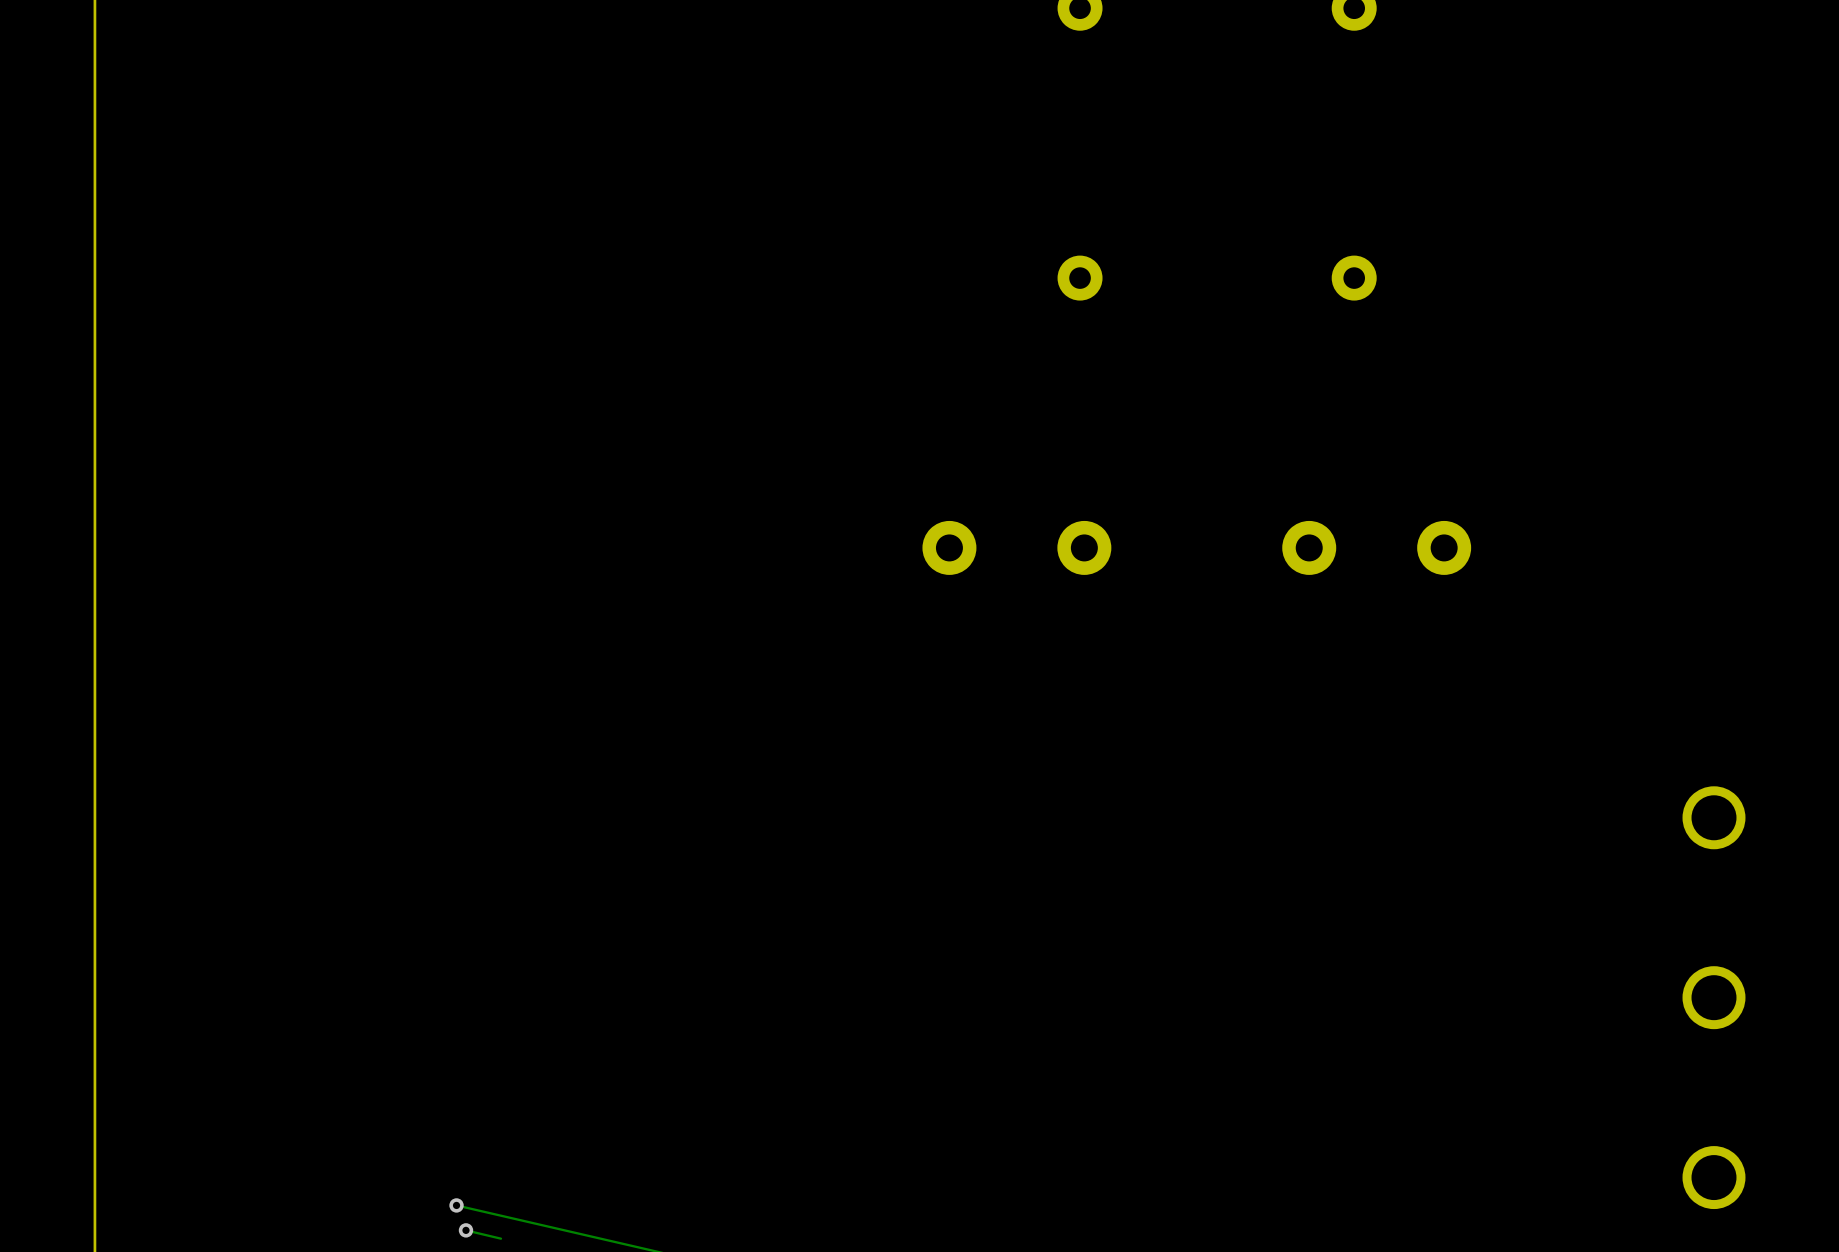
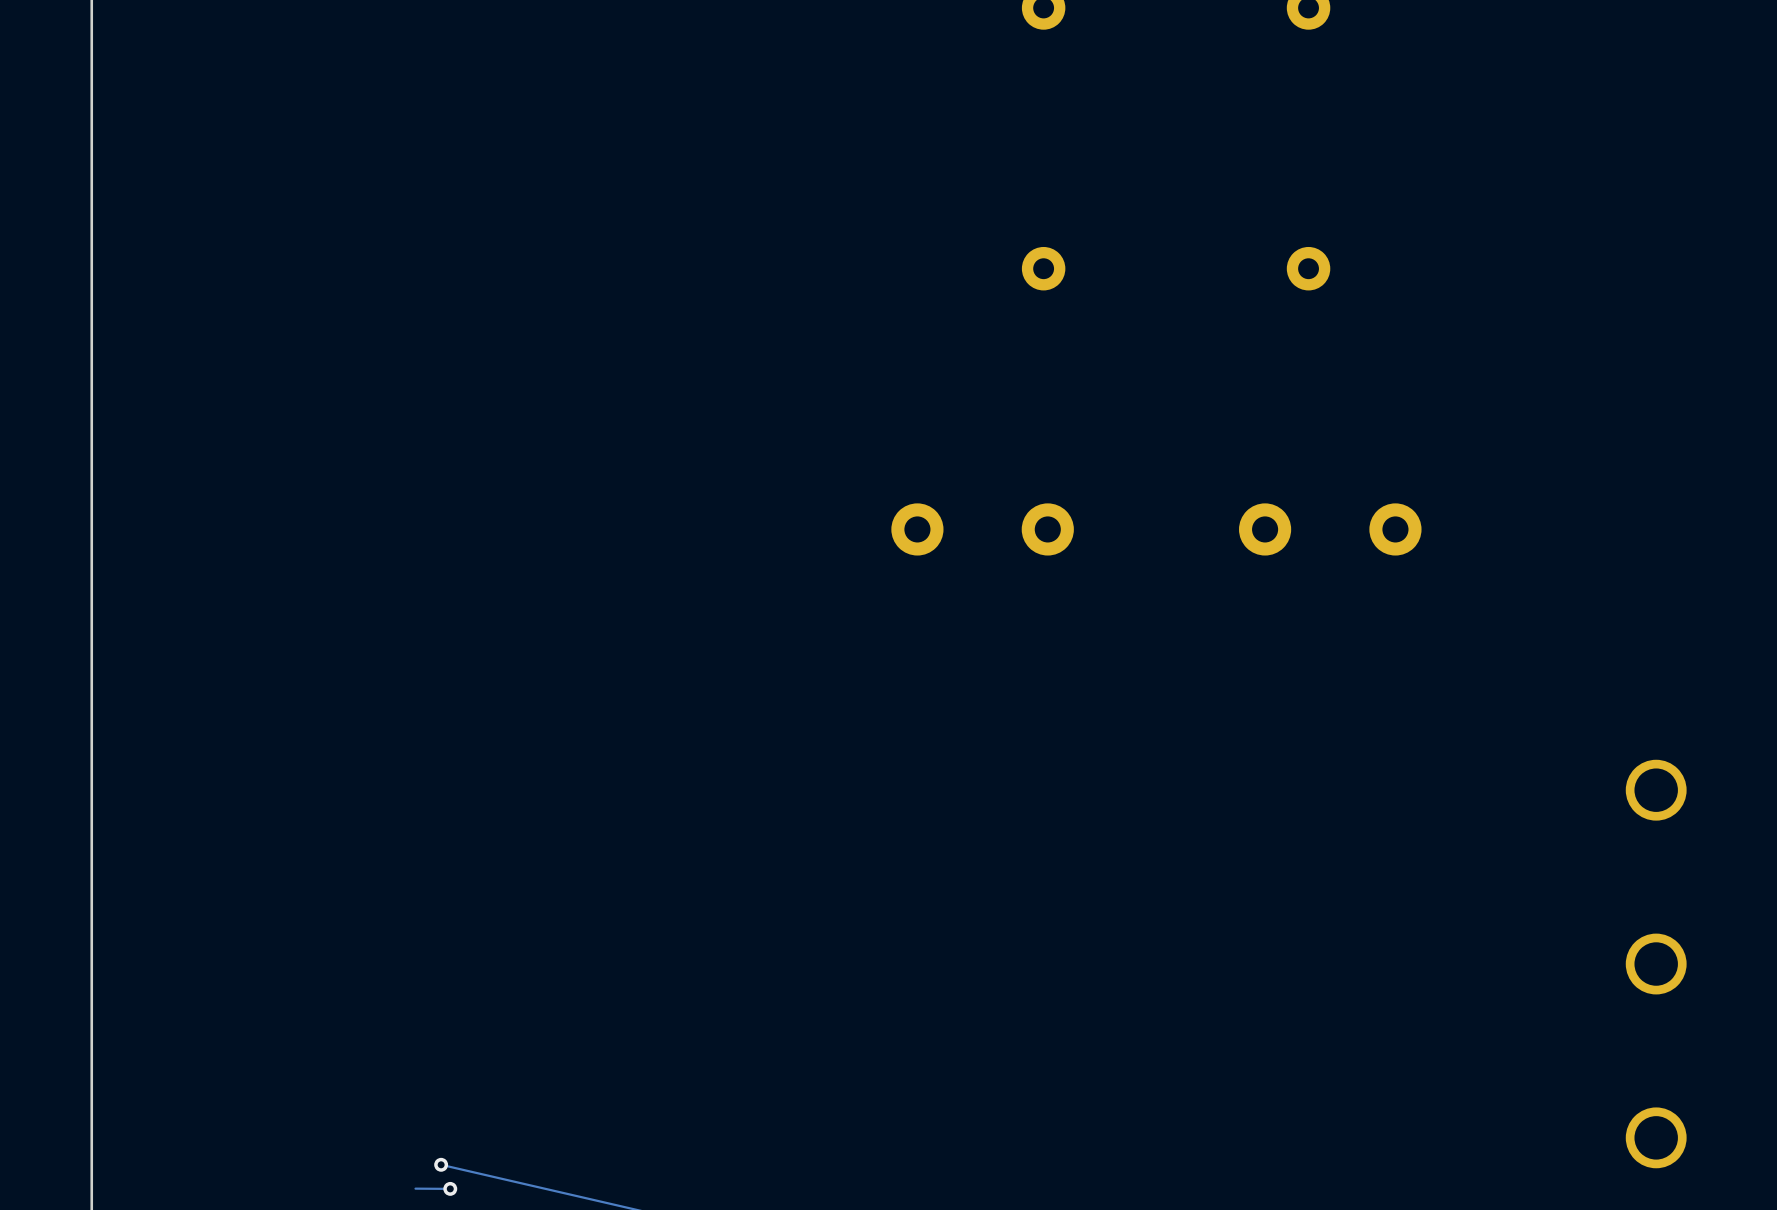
track: (465, 1230) (500, 1238) -> (450, 1188) (415, 1188)

